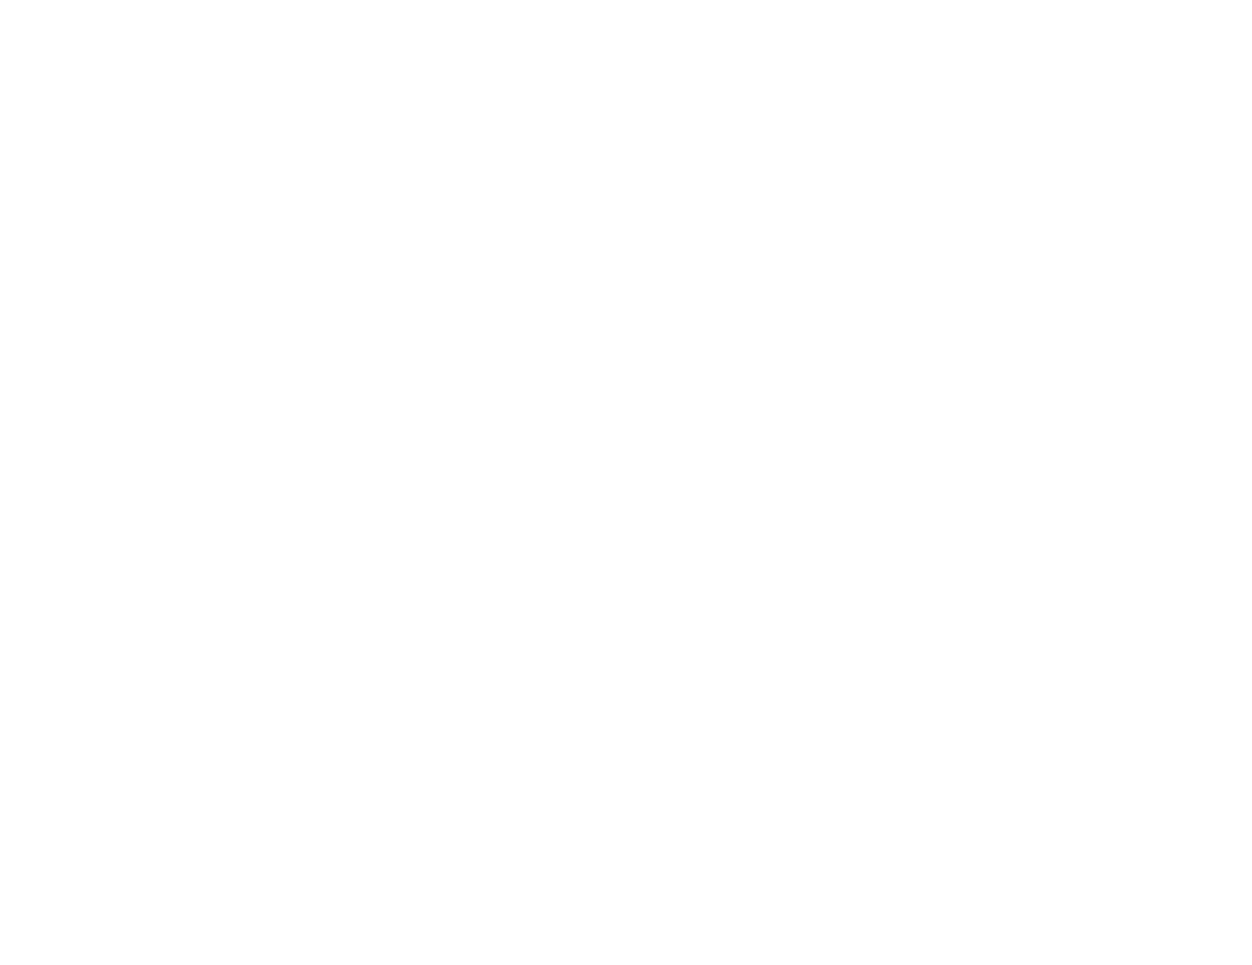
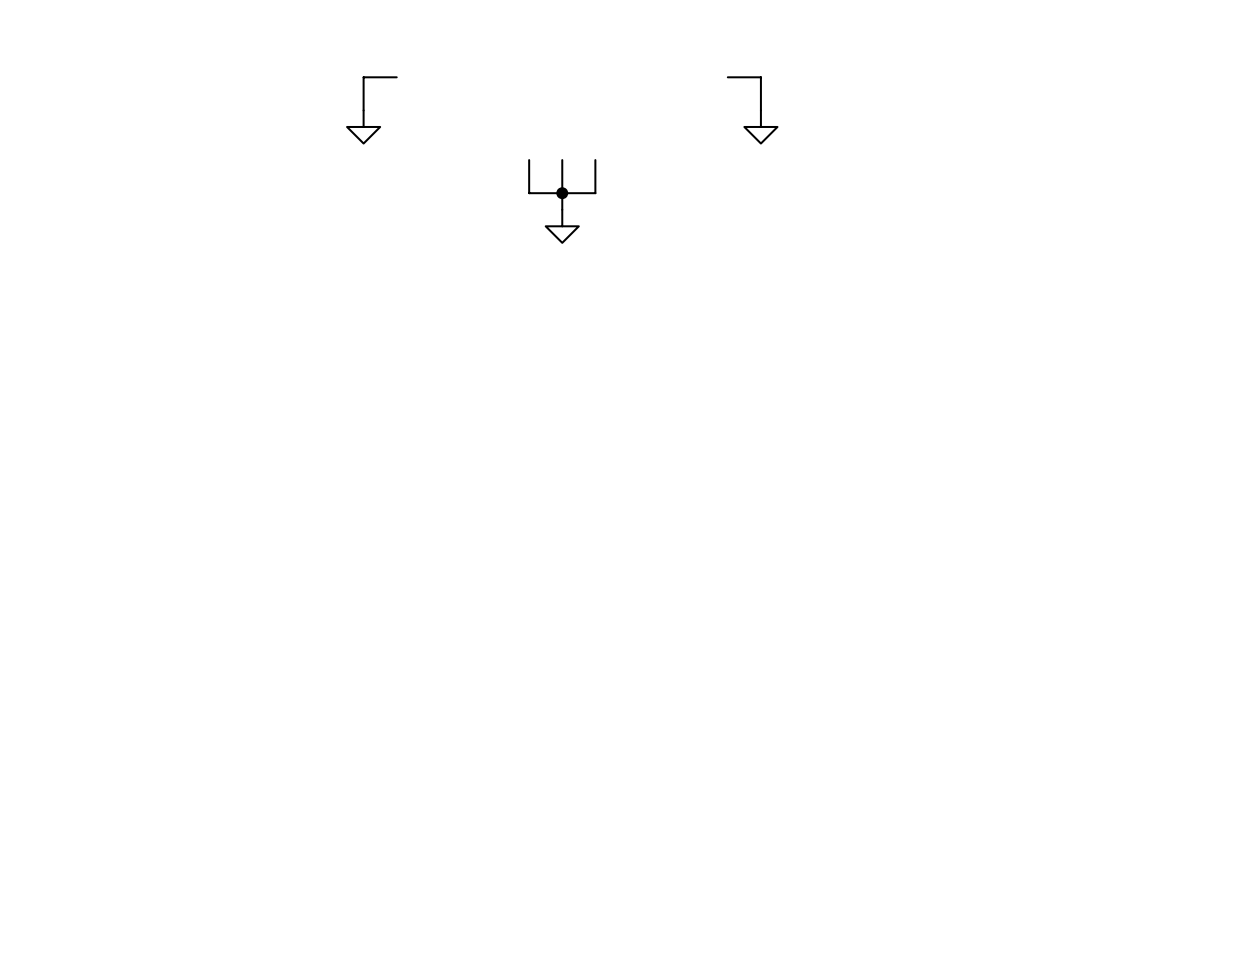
wire: none -> (396, 77) (363, 77) (363, 110)
wire: none -> (727, 77) (760, 77) (760, 110)
power symbol: none -> (363, 126)
power symbol: none -> (760, 126)
wire: none -> (529, 160) (529, 193) (595, 193) (595, 160)
wire: none -> (562, 160) (562, 209)
junction: none -> (562, 193)
power symbol: none -> (562, 226)

